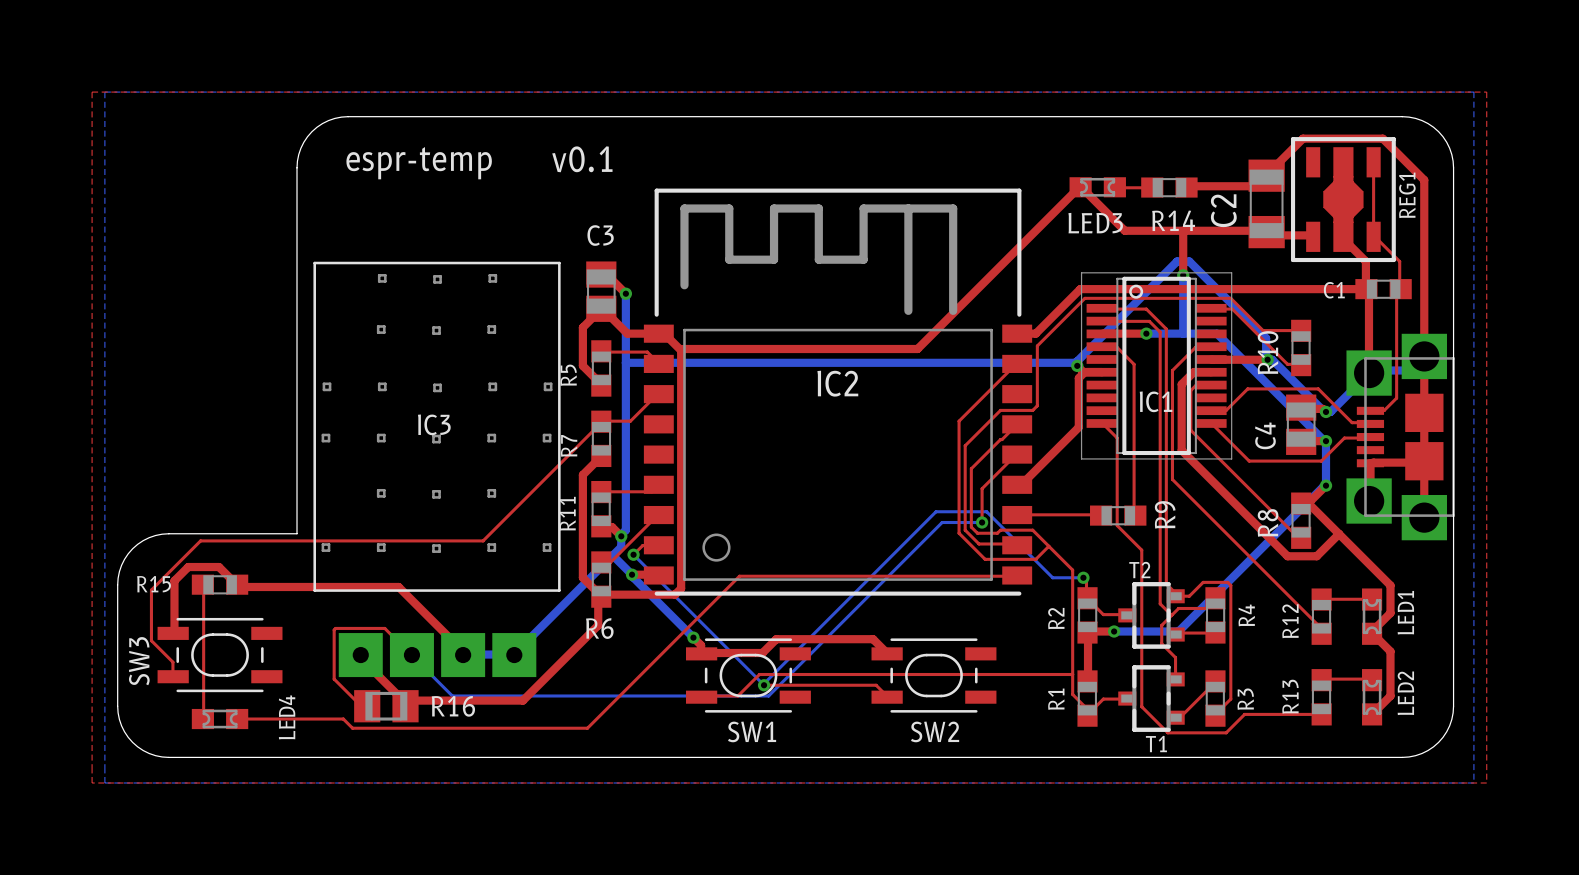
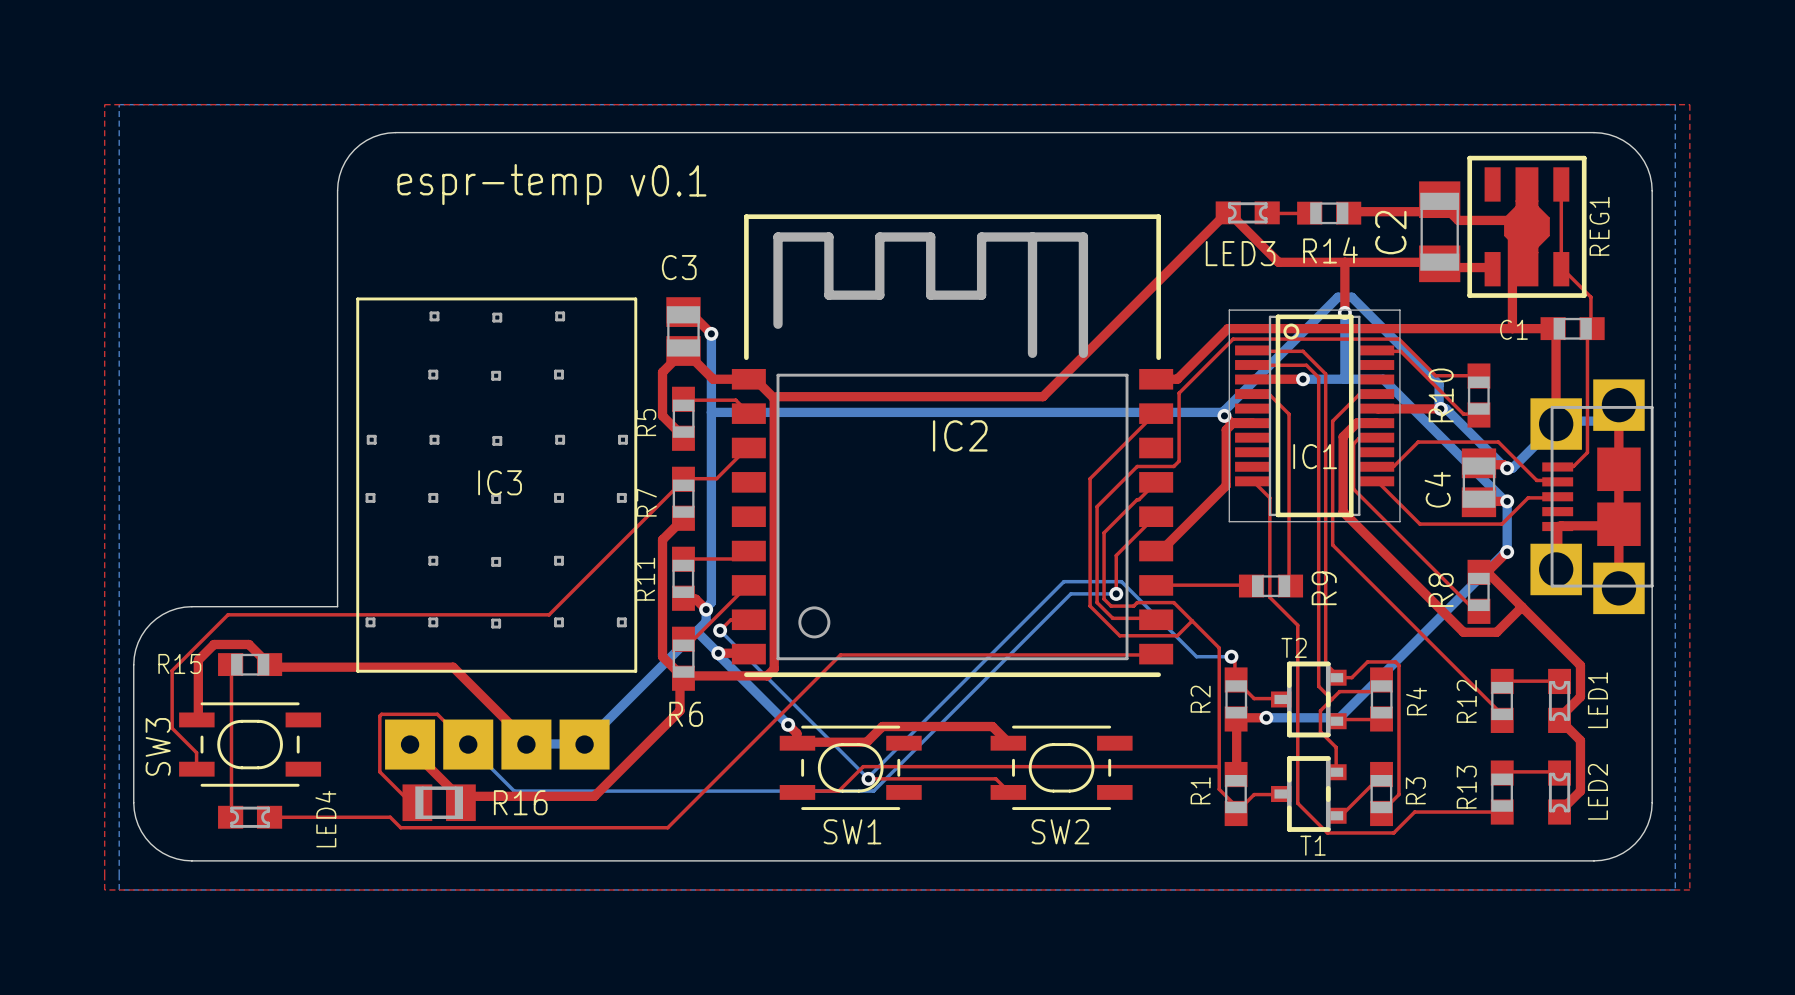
top track: (1266, 175) (1302, 138) (1382, 138) (1424, 180) (1424, 359) -> (1439, 199) (1458, 220) (1529, 220) (1512, 223) (1512, 328)
top track: (1343, 236) (1365, 261) (1365, 289) -> none

